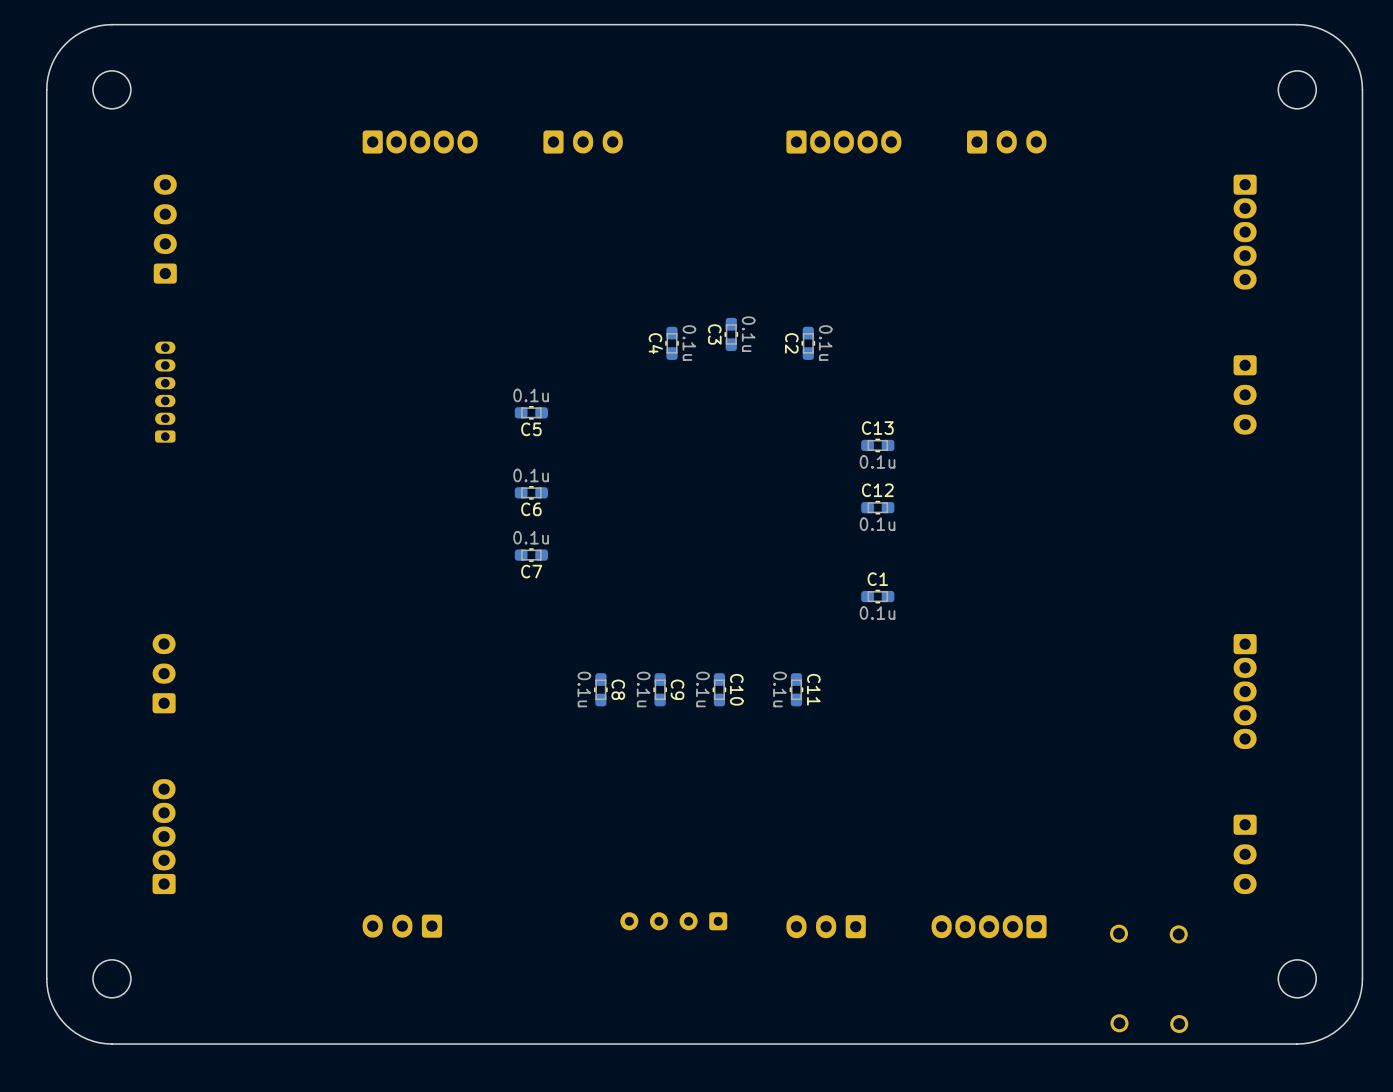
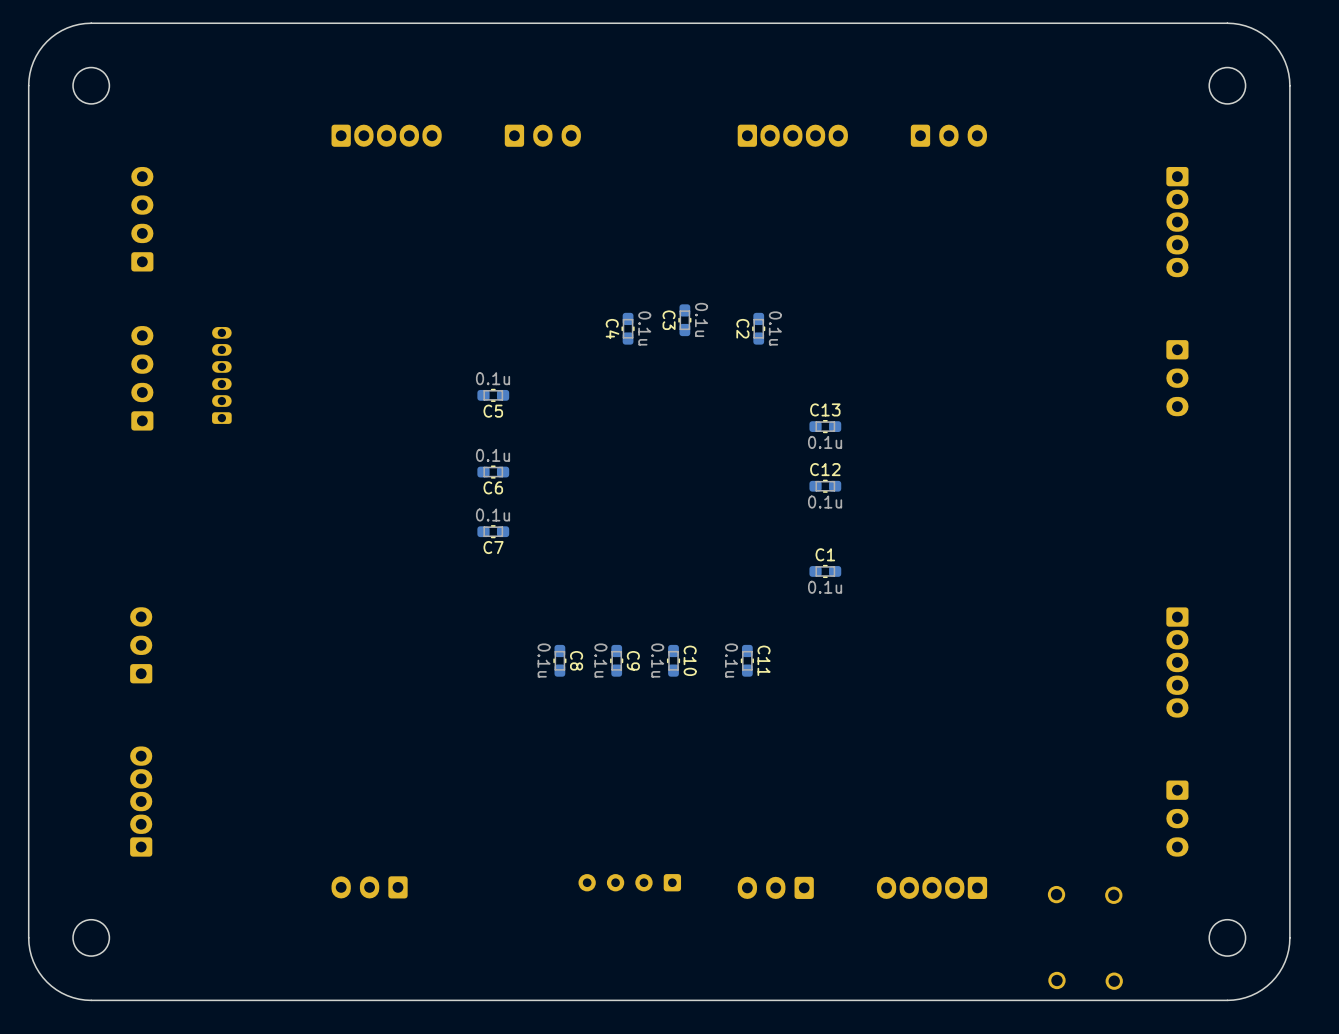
part footprint: [155, 341, 176, 443] -> [131, 326, 154, 431]
part: none -> (221, 375)

